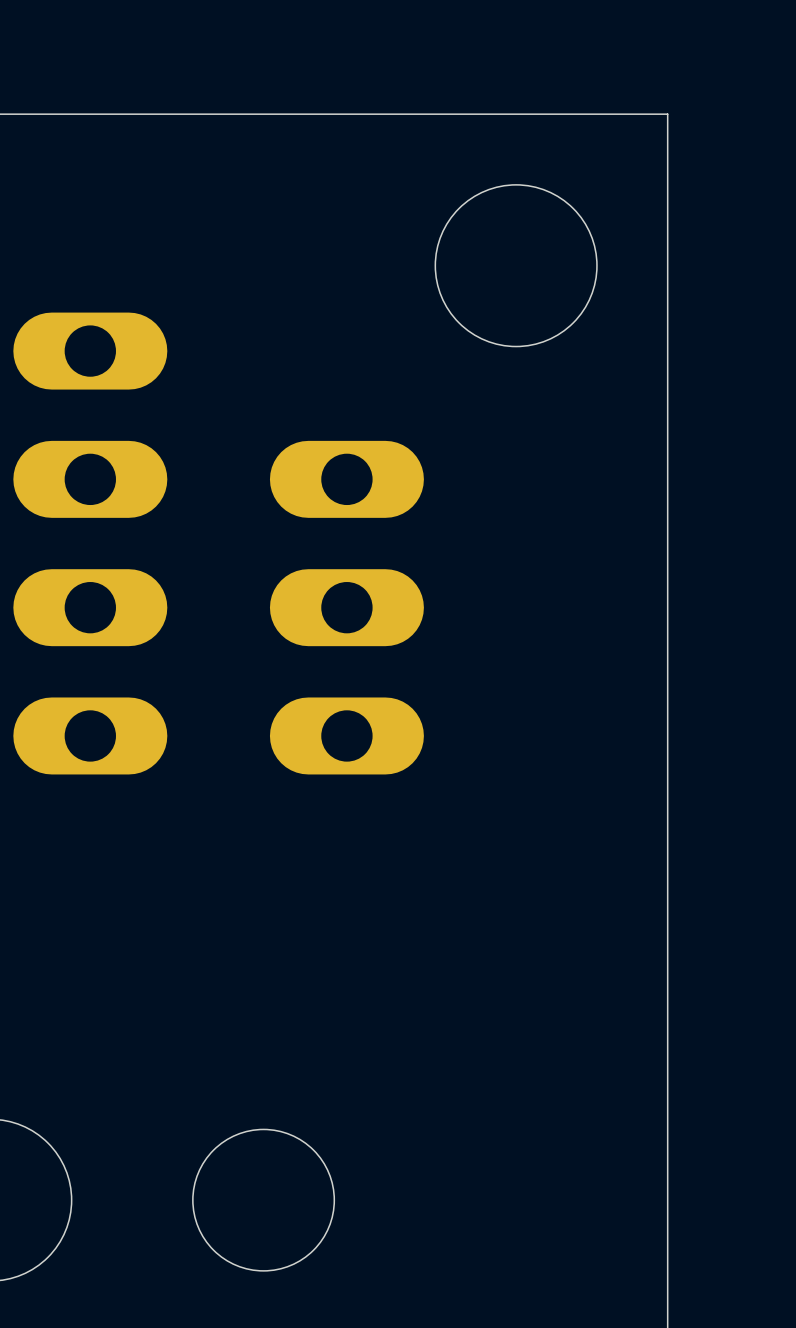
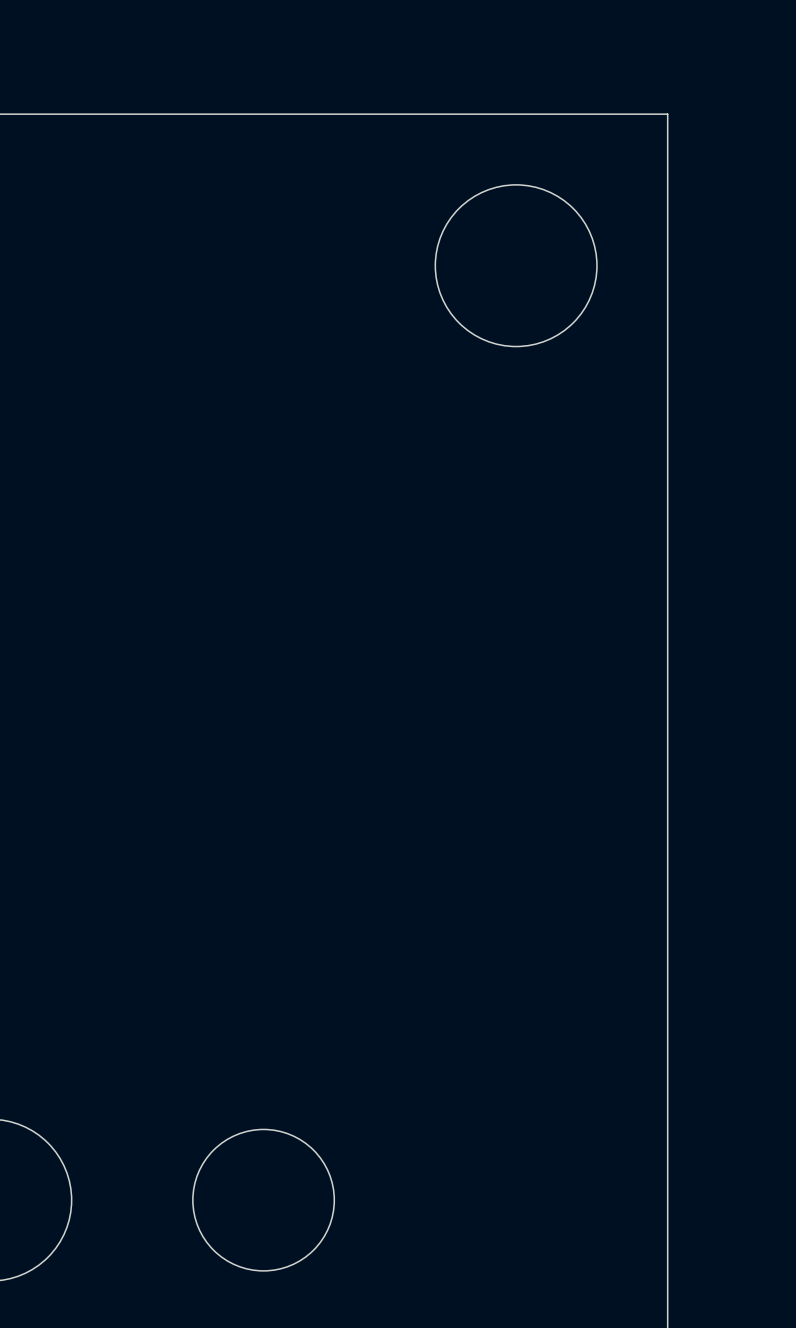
part: (90, 543) -> none
part: (346, 607) -> none

